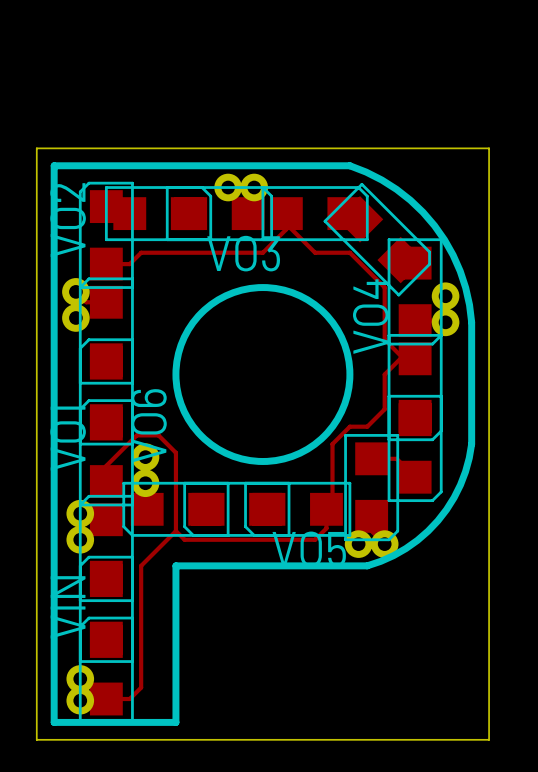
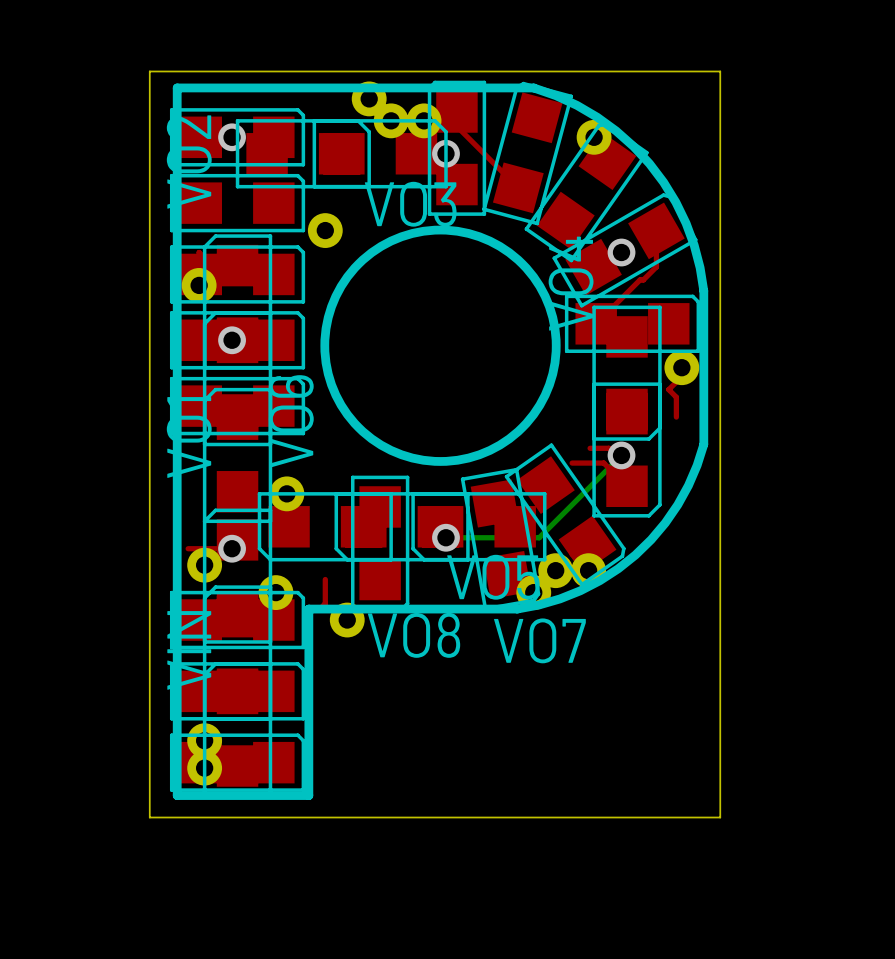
top track: none -> (456, 112) (456, 126) (518, 187)
part footprint: [323, 182, 431, 297] -> [524, 122, 649, 263]
via: none -> (232, 137)
part: none -> (237, 137)
part: none -> (594, 137)
part: none -> (456, 148)
via: none -> (445, 153)
top track: (286, 213) (286, 229) (262, 252) (141, 252) (129, 264) (106, 264) -> none
part: (315, 213) -> none
part: none -> (527, 153)
top track: (286, 223) (315, 252) (349, 252) (384, 287) (384, 339) (402, 357) (415, 358) (400, 358) (384, 374) (384, 409) (367, 426) (349, 426) (332, 444) (332, 503) (326, 509) (326, 528) (315, 539) (184, 539) (175, 531) -> none
part: (106, 235) -> none
part footprint: [387, 238, 443, 346] -> [552, 193, 698, 308]
part: none -> (237, 203)
part: none -> (325, 230)
top track: none -> (656, 230) (656, 266) (643, 279) (640, 279) (596, 323)
drawing shape: [172, 284, 354, 465] -> [320, 225, 561, 466]
part: (75, 291) -> none
via: none -> (621, 252)
part: (445, 296) -> none
part: none -> (237, 274)
VO4 position: (445, 322) -> (369, 98)
part: none -> (632, 323)
via: none -> (232, 340)
part: none -> (237, 340)
top track: none -> (681, 367) (681, 376) (668, 389) (676, 397) (676, 417)
part: none -> (681, 367)
part: none -> (237, 406)
part footprint: [344, 434, 400, 542] -> [504, 443, 626, 587]
top track: none -> (590, 448) (608, 448) (621, 455)
bottom track: none -> (616, 449) (621, 455) (539, 537) (445, 537)
via: none -> (621, 455)
part: (145, 457) -> none
top track: (106, 481) (106, 465) (136, 435) (158, 435) (175, 452) (175, 531) -> none
part: (80, 513) -> none
via: none -> (445, 537)
part: none -> (500, 539)
part: none -> (380, 543)
top track: none -> (188, 548) (232, 548)
via: none -> (232, 548)
top track: (175, 531) (141, 565) (141, 687) (129, 699) (80, 700) (80, 678) -> none
top track: none -> (325, 579) (325, 603) (319, 609) (336, 609) (347, 620)
part: none -> (275, 592)
VO7: none -> (533, 592)
part: none -> (237, 620)
VO8: none -> (347, 620)
part: none -> (237, 691)
part: none -> (237, 762)
line: (58, 722) (54, 722) (54, 165) (349, 165) (381, 180) (410, 200) (434, 225) (444, 239) (460, 271) (469, 304) (471, 322) (471, 444) (465, 471) (446, 509) (428, 531) (393, 555) (367, 565) (175, 565) (175, 722) (162, 722) -> (177, 795) (177, 87) (533, 87) (577, 105) (616, 130) (649, 163) (663, 182) (686, 223) (694, 245) (703, 290) (703, 444) (688, 485) (665, 522) (635, 555) (618, 568) (580, 590) (559, 598) (517, 609) (308, 609) (308, 795)

